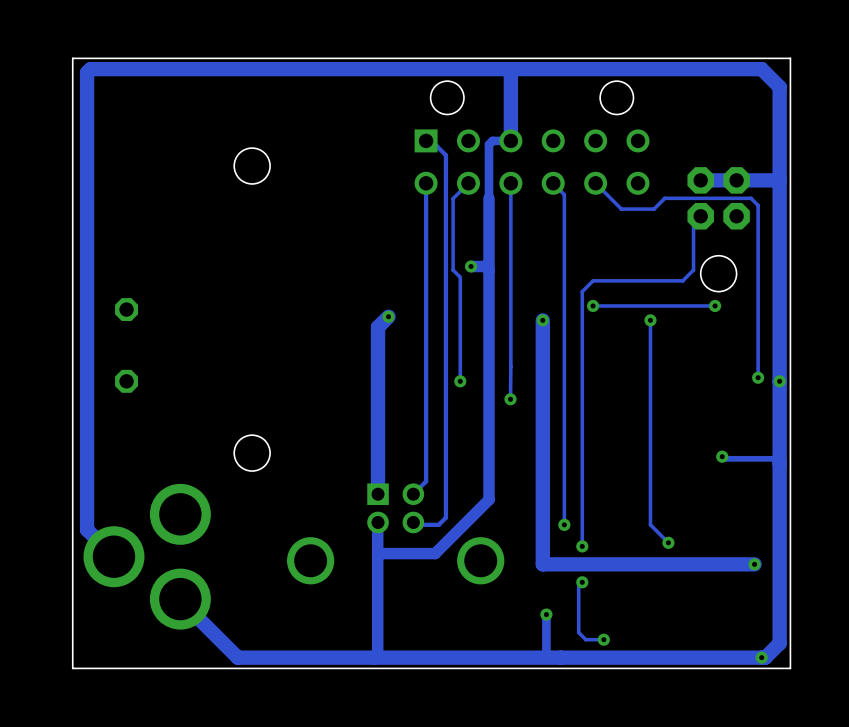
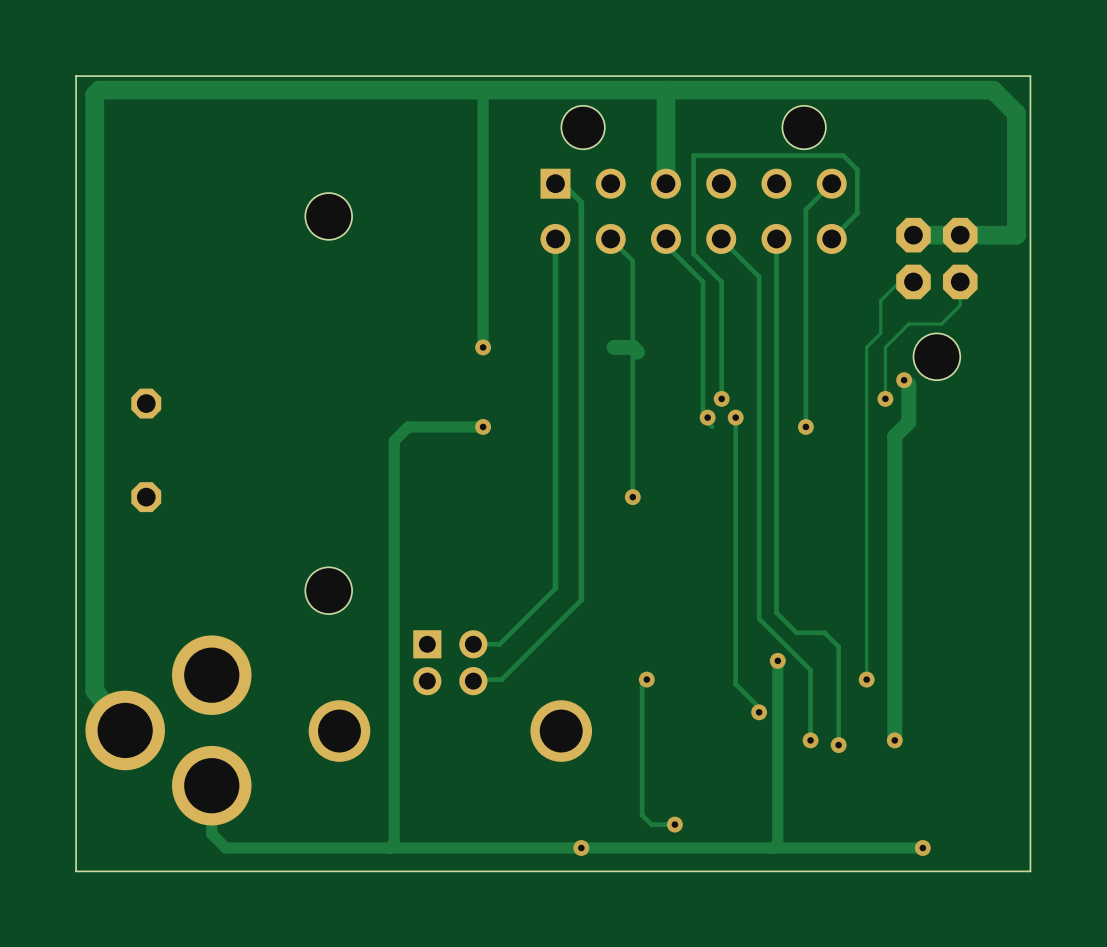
board edge: (72, 58) (72, 668) -> (94, 76) (76, 76) (76, 871) (94, 871)
track: (90, 69) (87, 72) (87, 529) (113, 556) -> (118, 90) (99, 90) (94, 94) (94, 690) (125, 730)
track: none -> (483, 90) (483, 347)
track: (510, 140) (492, 140) (488, 144) (488, 499) (435, 553) (377, 553) -> none
track: none -> (831, 183) (805, 209) (805, 426)
track: (779, 180) (779, 643) (765, 657) (237, 657) (180, 600) -> none
track: (468, 183) (453, 198) (453, 270) (460, 277) (460, 381) -> (610, 238) (632, 261) (632, 497)
track: (553, 183) (564, 194) (564, 320) -> (721, 238) (759, 276) (759, 380)
track: (595, 183) (621, 209) (654, 209) (664, 198) (750, 198) (758, 205) (758, 377) -> (776, 238) (776, 612) (796, 632) (824, 632) (838, 646) (838, 745)
track: none -> (831, 238) (857, 213) (857, 169) (843, 155) (693, 155) (693, 253) (721, 281) (721, 398)
track: (510, 187) (510, 399) -> (665, 244) (702, 281) (702, 417) (712, 426)
track: (700, 216) (693, 223) (693, 270) (682, 280) (593, 280) (582, 291) -> (913, 281) (899, 281) (880, 300) (880, 333) (866, 347) (866, 679)
track: none -> (960, 281) (960, 305) (941, 324) (908, 324) (885, 347) (885, 398)
via: none -> (483, 347)
via: (471, 266) -> none
track: none -> (904, 380) (908, 384) (908, 422) (894, 436) (894, 740)
via: none -> (904, 380)
via: none -> (721, 398)
via: (593, 305) -> none
via: none -> (885, 398)
track: (715, 305) (593, 305) -> none
via: (715, 305) -> none
part position: (126, 309) -> (146, 403)
track: (388, 316) (378, 327) (378, 494) -> none
via position: (388, 316) -> (483, 426)
track: (542, 320) (542, 564) (754, 564) -> none
via: none -> (735, 417)
track: (650, 320) (650, 524) (668, 542) -> none
via: (650, 320) -> none
track: none -> (483, 426) (408, 426) (394, 440) (394, 843) (389, 847)
via: none -> (805, 426)
via: (758, 377) -> none
part position: (126, 381) -> (146, 497)
via: (460, 381) -> none
via: none -> (632, 497)
via: (779, 381) -> none
via: (510, 399) -> none
track: (426, 451) (426, 481) (413, 494) -> (555, 588) (499, 644) (473, 644)
track: (722, 456) (720, 458) (774, 458) (779, 463) -> none
via: (722, 456) -> none
track: (445, 460) (445, 517) (438, 524) (415, 524) (413, 522) -> (581, 600) (501, 679) (473, 681)
track: (582, 474) (582, 546) -> (759, 618) (810, 670) (810, 740)
track: none -> (777, 660) (777, 843) (773, 847)
via: none -> (777, 660)
track: none -> (646, 679) (642, 684) (642, 815) (651, 824) (674, 824)
via: none -> (646, 679)
via: none -> (866, 679)
track: (378, 522) (377, 654) (374, 657) -> none
track: none -> (735, 684) (759, 707)
via: (564, 524) -> none
part position: (395, 533) -> (450, 696)
via: (668, 542) -> none
part position: (147, 556) -> (168, 730)
via: (754, 564) -> none
via: none -> (810, 740)
via: none -> (894, 740)
via: none -> (838, 745)
track: (582, 582) (578, 585) (578, 632) (585, 639) (603, 639) -> none
via: (582, 582) -> none
track: none -> (211, 785) (211, 833) (225, 847) (922, 847)
track: (546, 614) (546, 654) (560, 657) -> none
via position: (546, 614) -> (674, 824)
via: (603, 639) -> none
via: none -> (581, 847)
via: none -> (922, 847)
via: (761, 657) -> none

